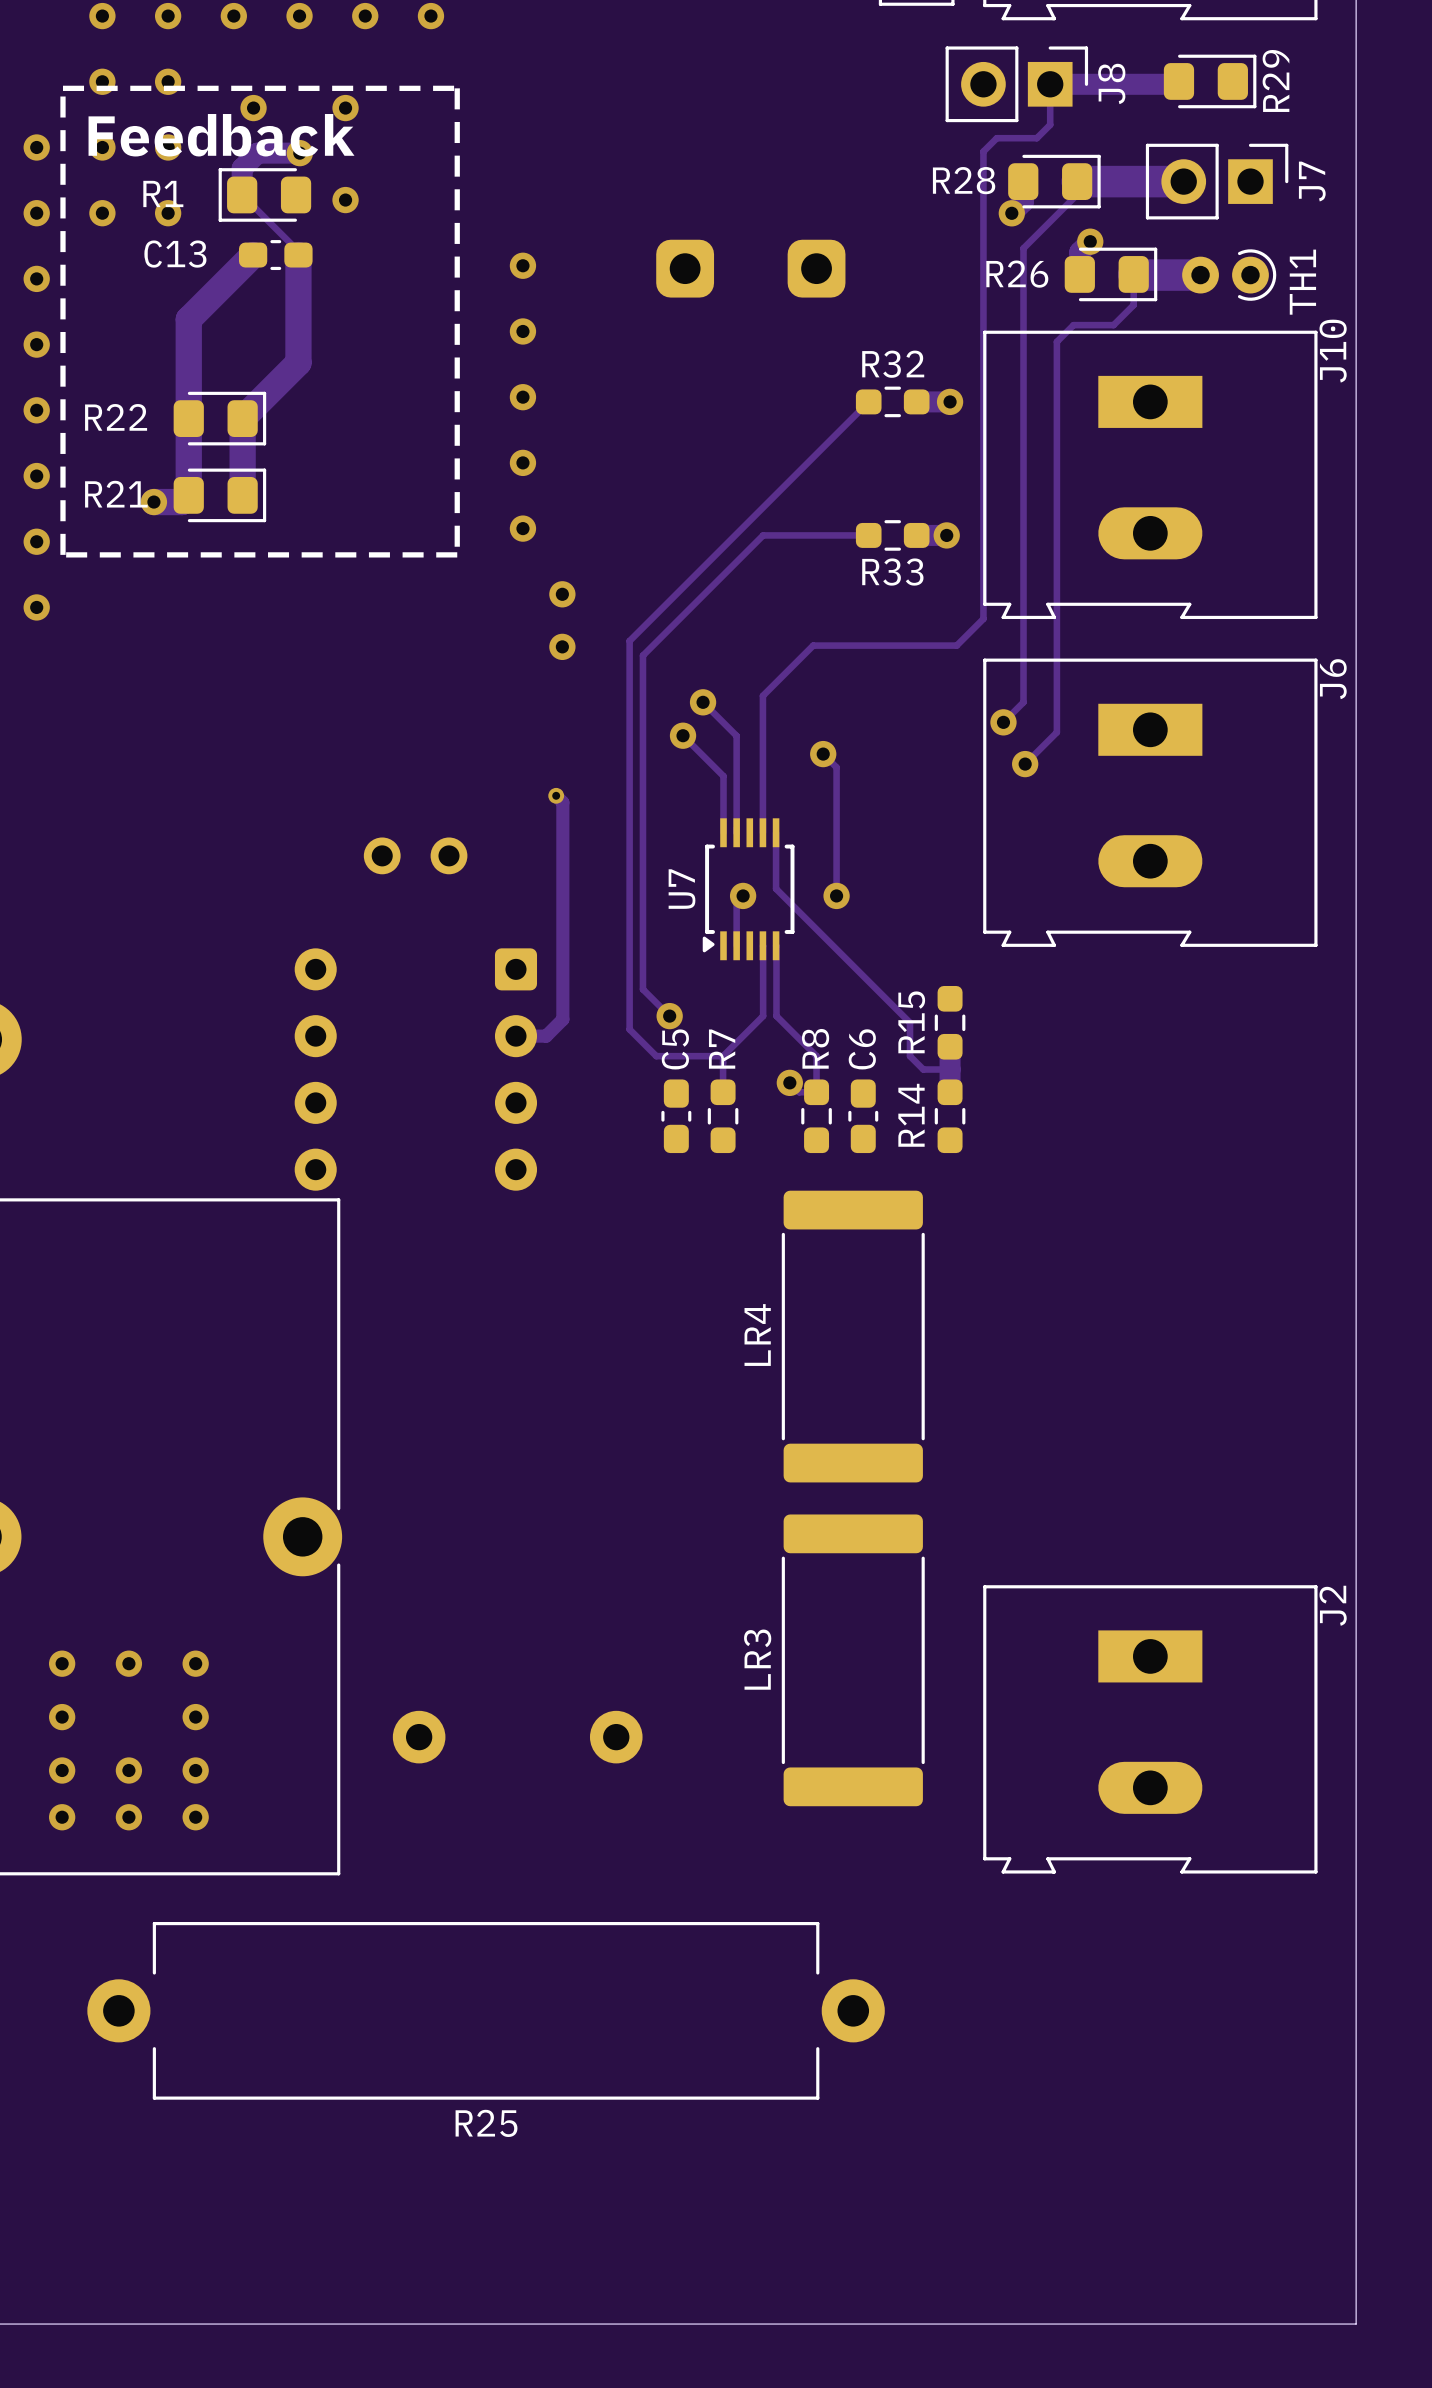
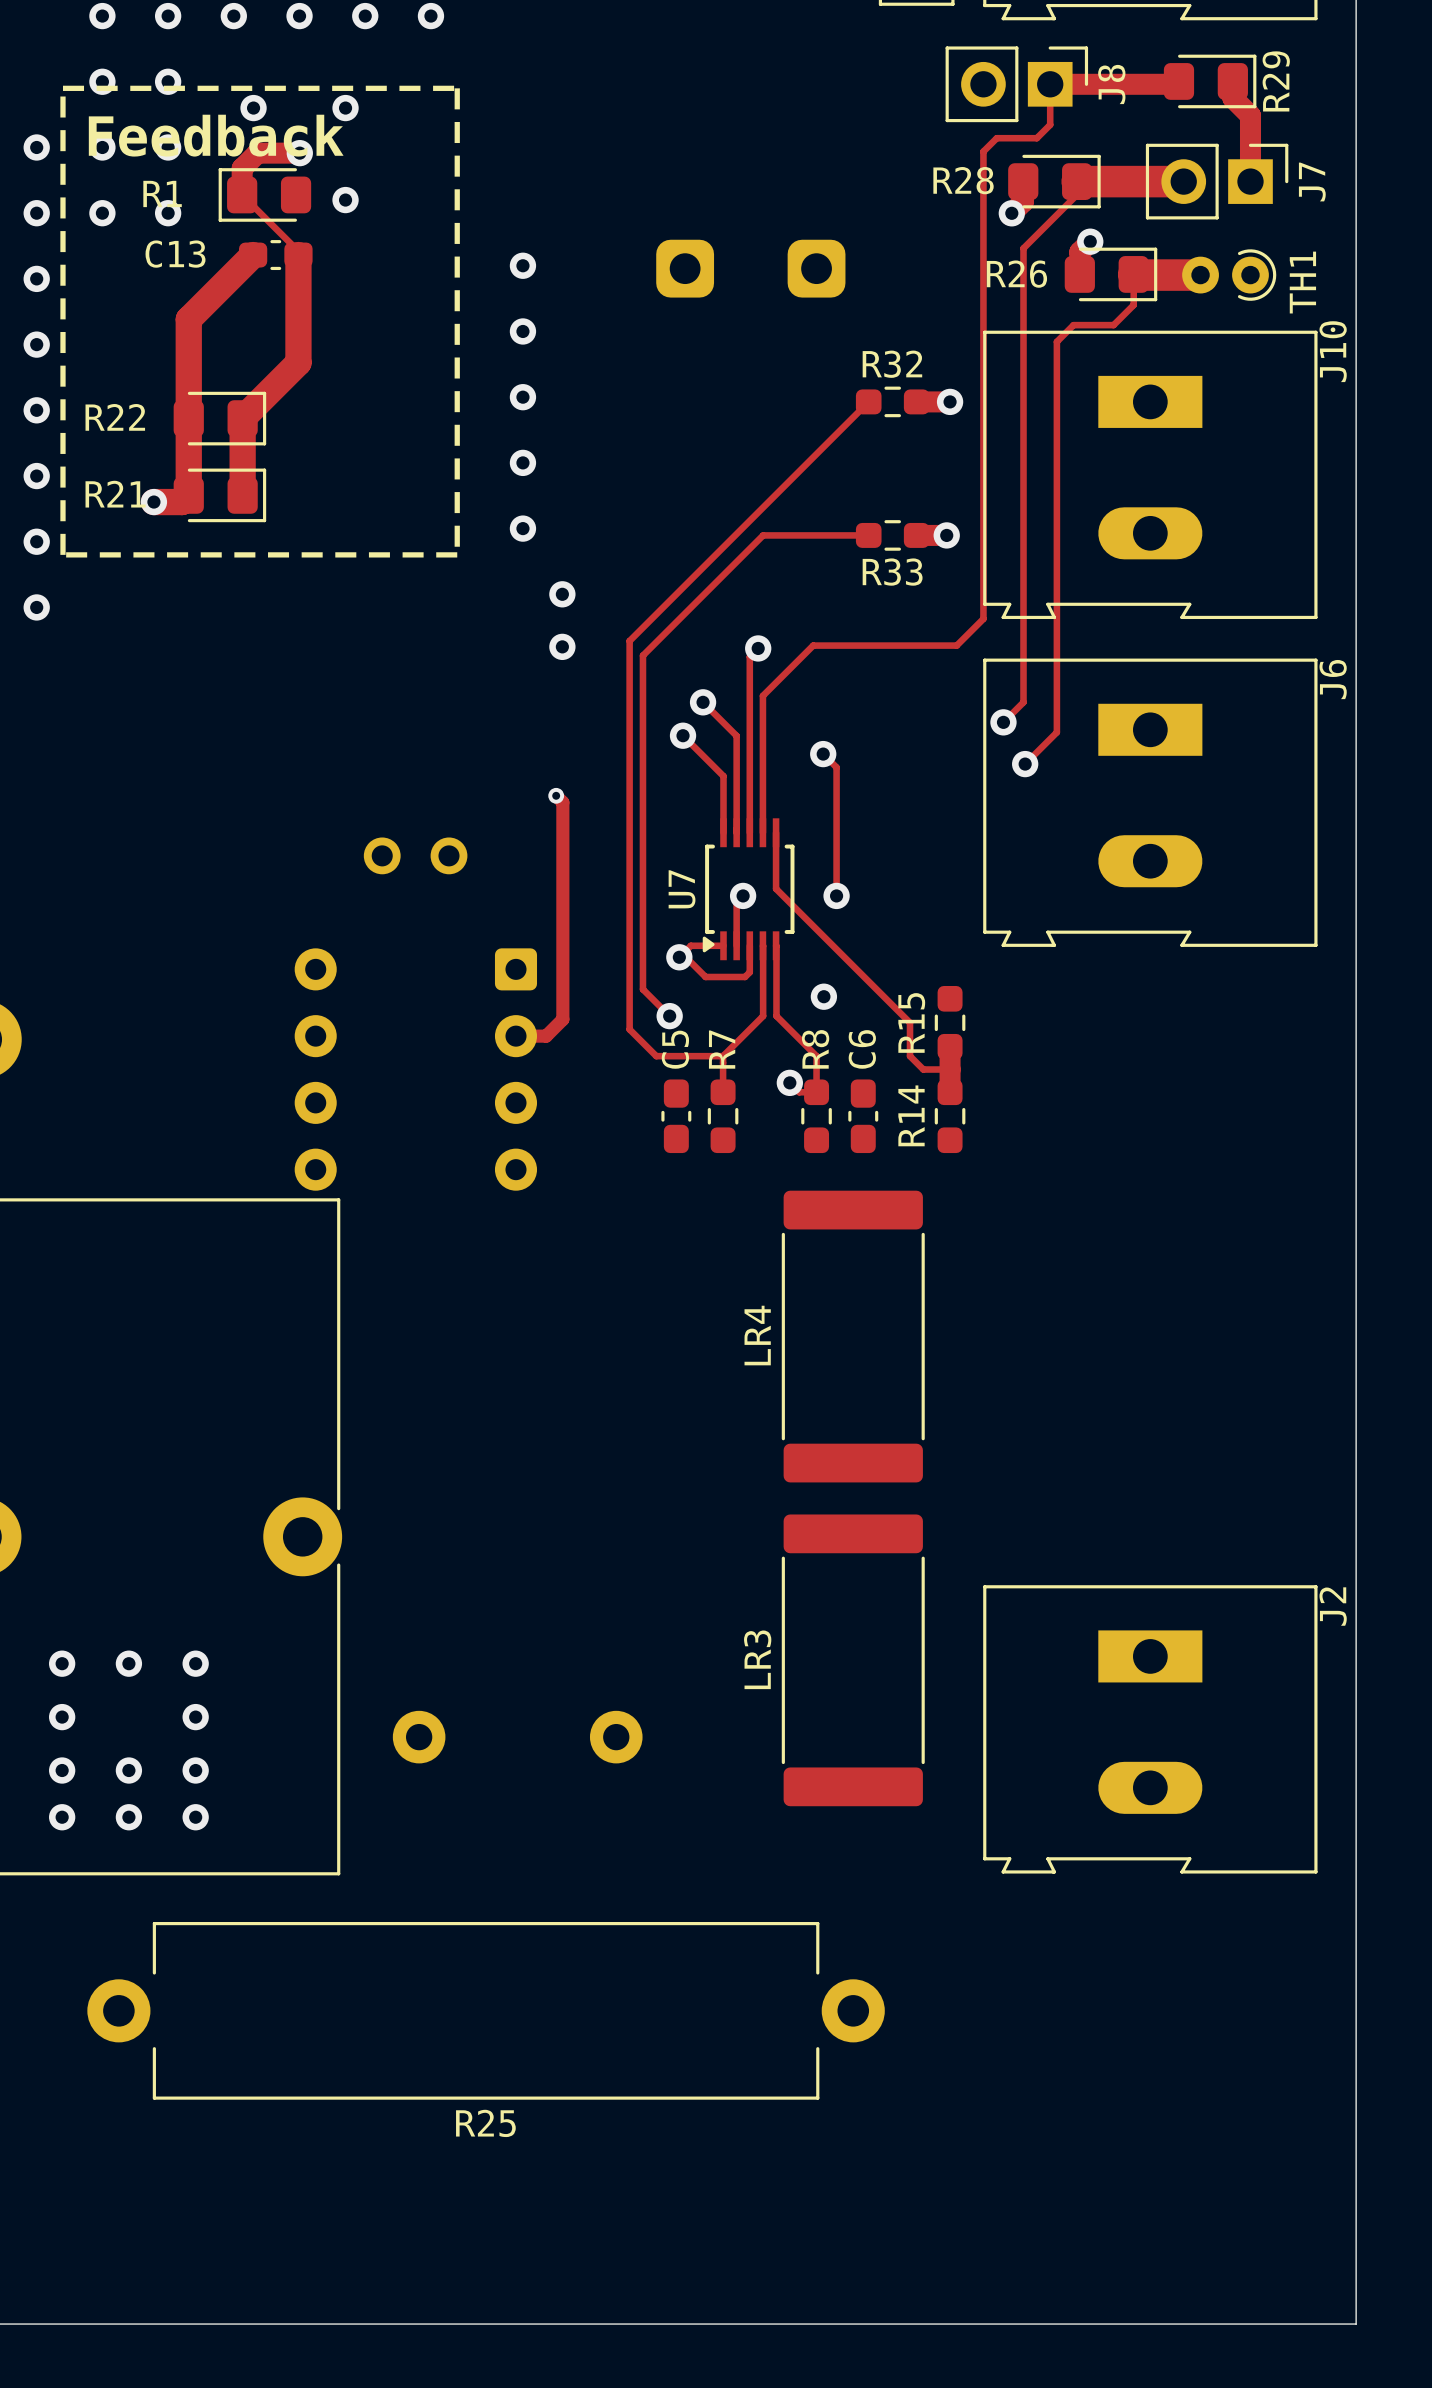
track: none -> (1232, 81) (1232, 98) (1250, 115) (1250, 181)
track: none -> (758, 648) (749, 656) (749, 832)
via: none -> (758, 648)
track: none -> (723, 945) (690, 945) (679, 957) (685, 957) (705, 977) (745, 977) (749, 972) (749, 945)
via: none -> (679, 957)
via: none -> (823, 996)

